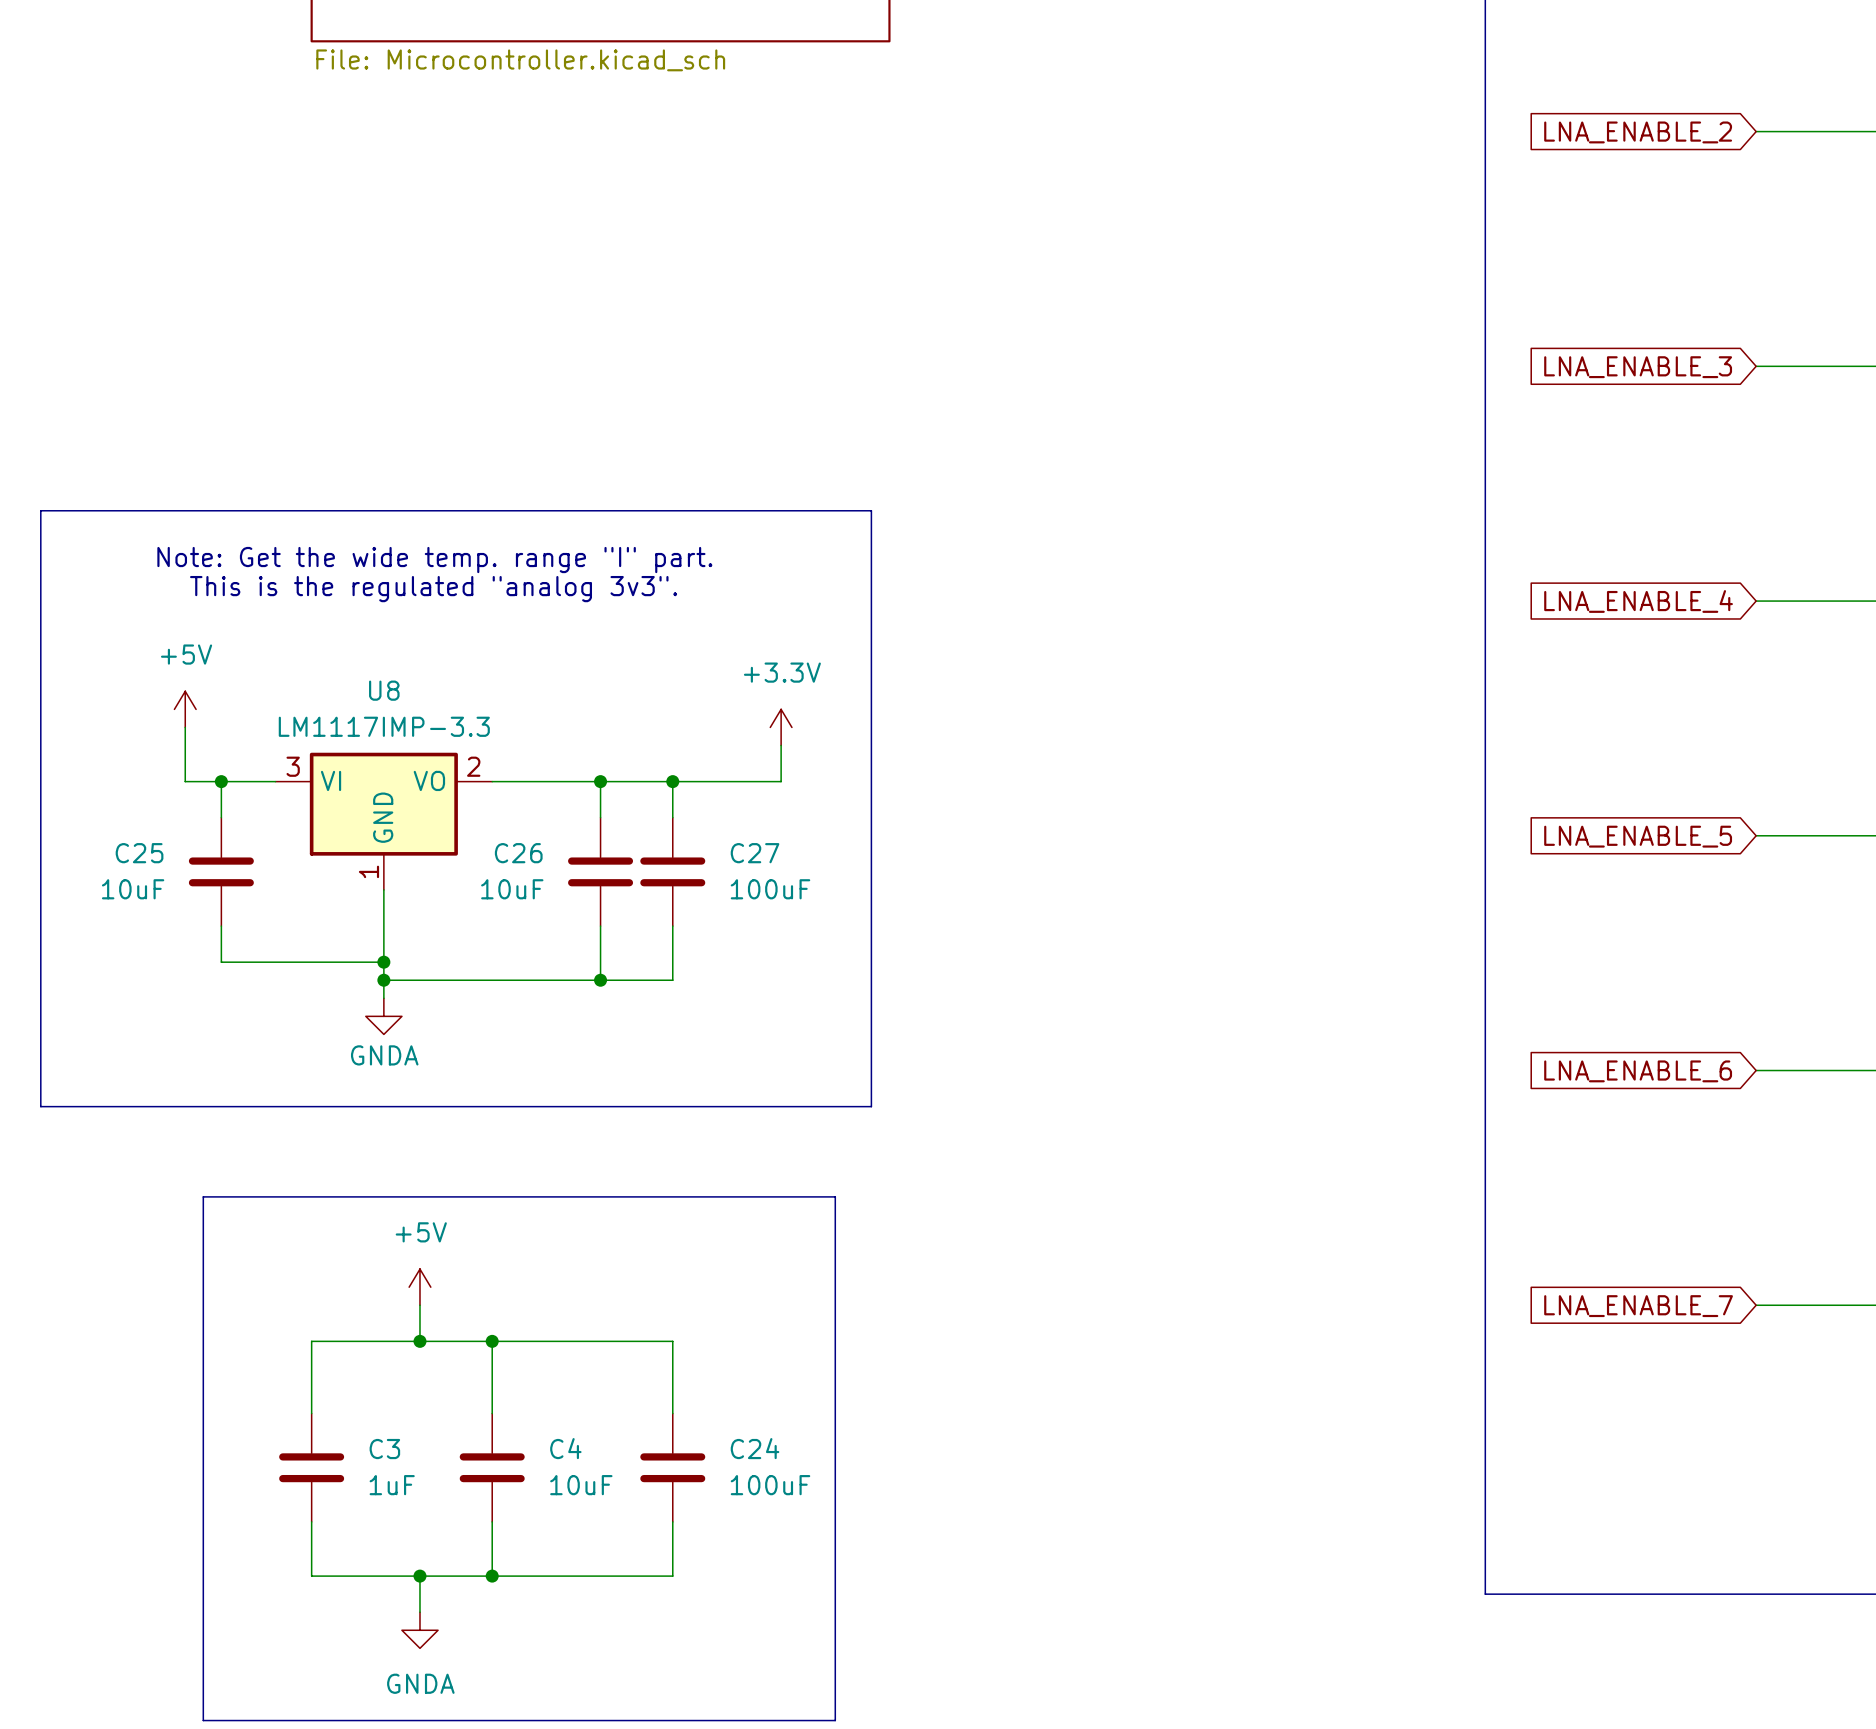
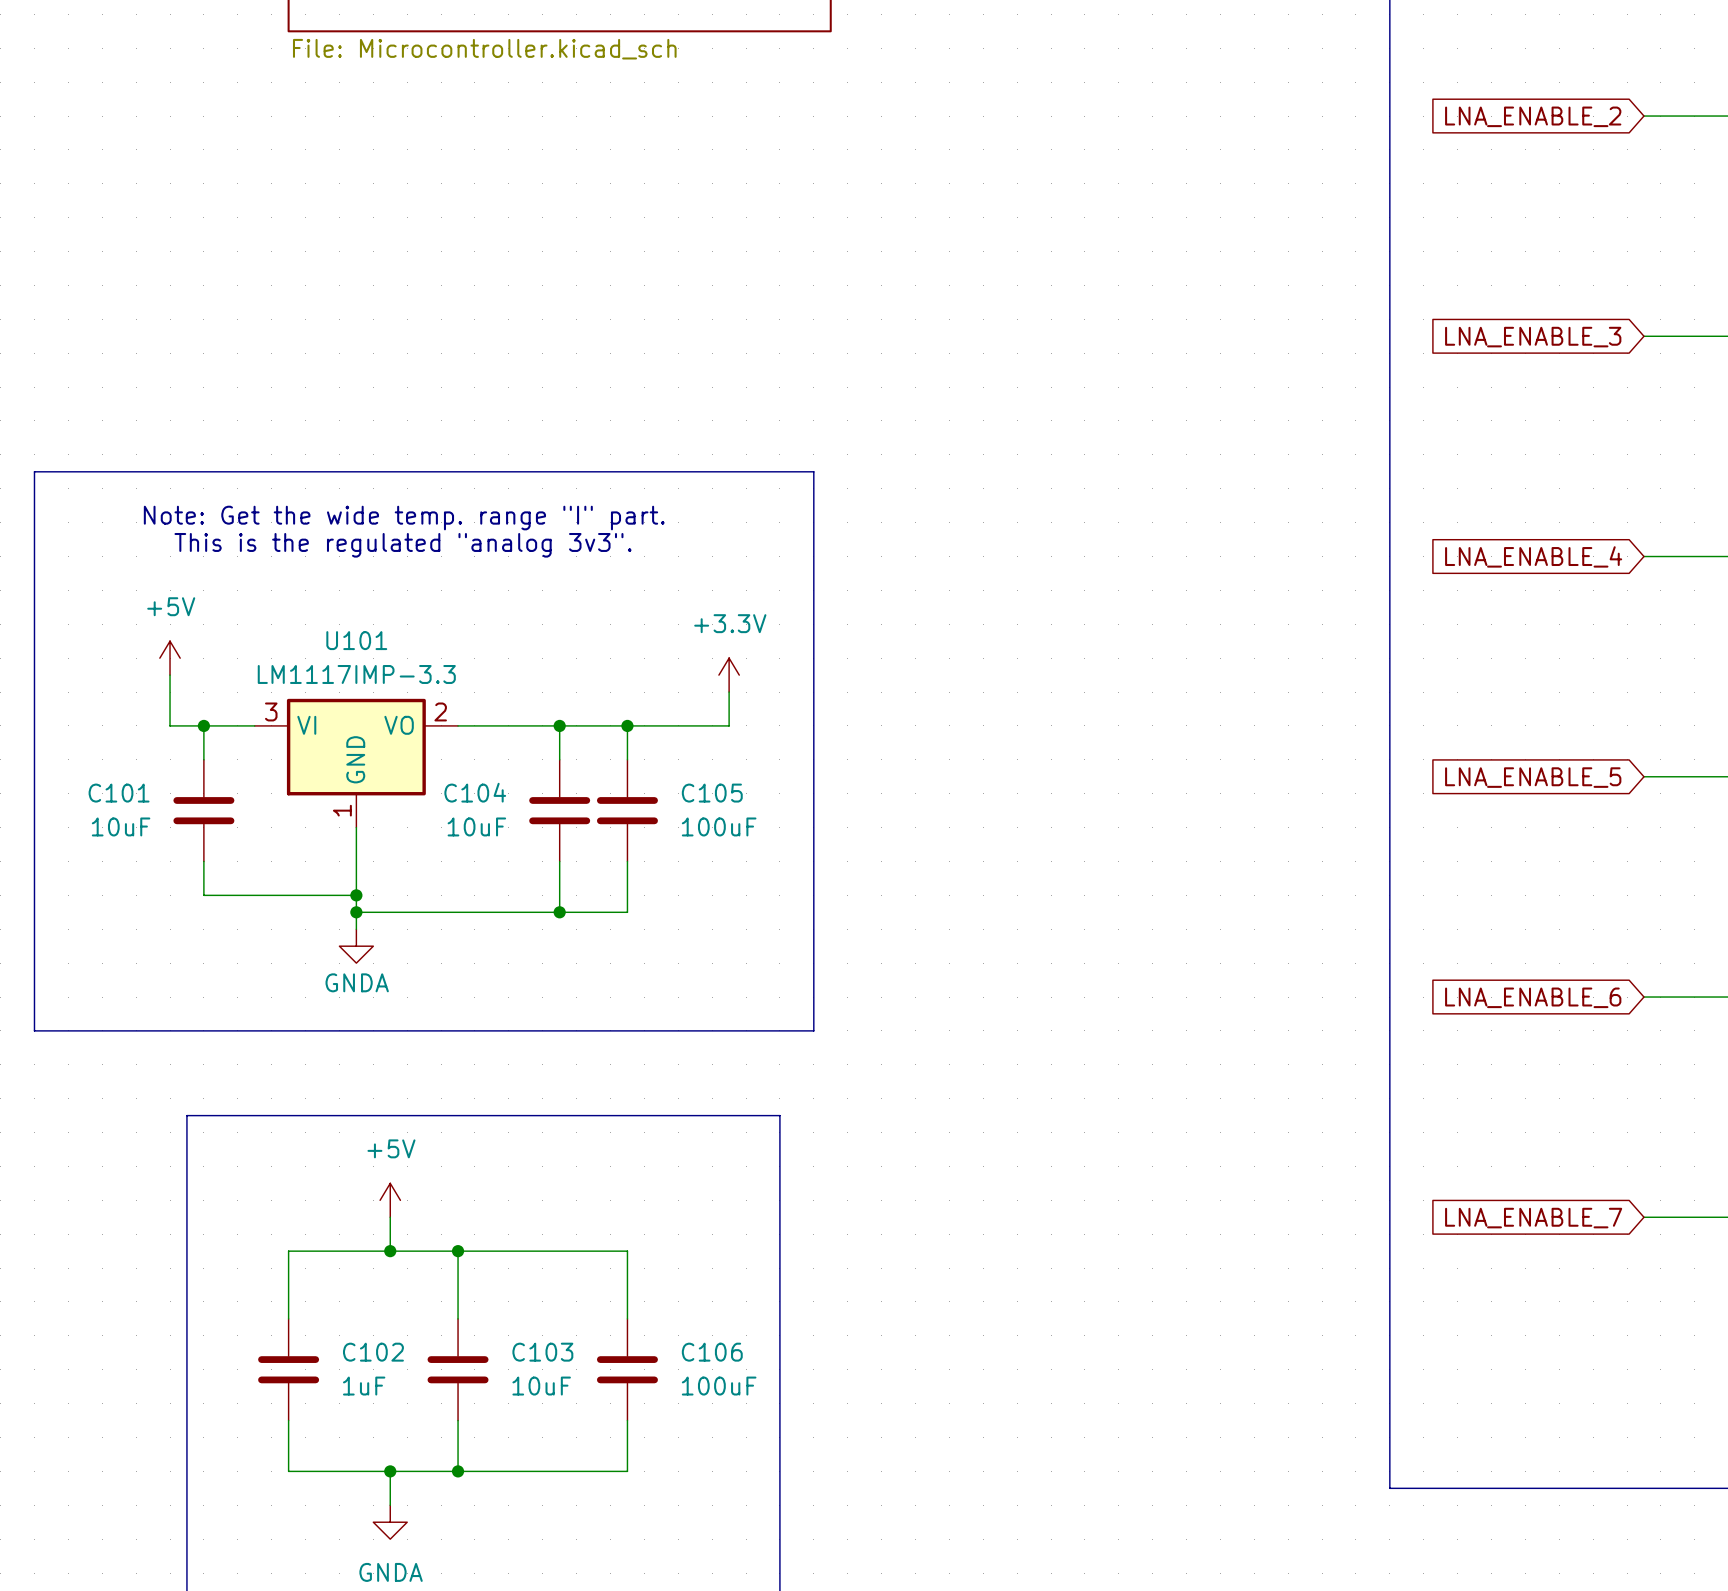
U8 name: U8 (384, 690) -> U101 (356, 640)
C25 name: C25 (139, 853) -> C101 (119, 793)
C26 name: C26 (518, 853) -> C104 (475, 792)
C27 name: C27 (755, 853) -> C105 (712, 793)
C4 name: C4 (565, 1448) -> C103 (542, 1352)
C24 name: C24 (755, 1448) -> C106 (712, 1352)
C3 name: C3 (384, 1449) -> C102 (373, 1352)

